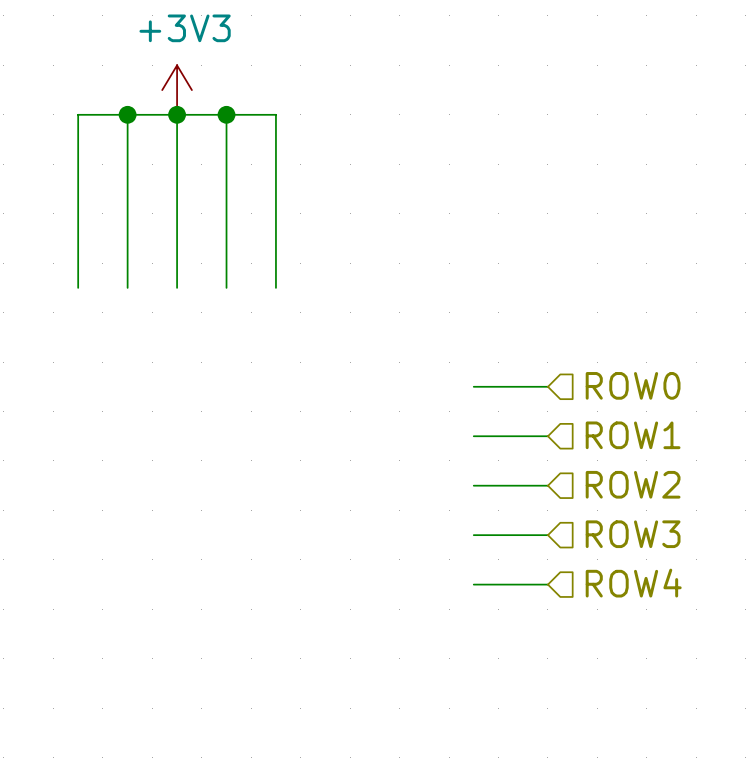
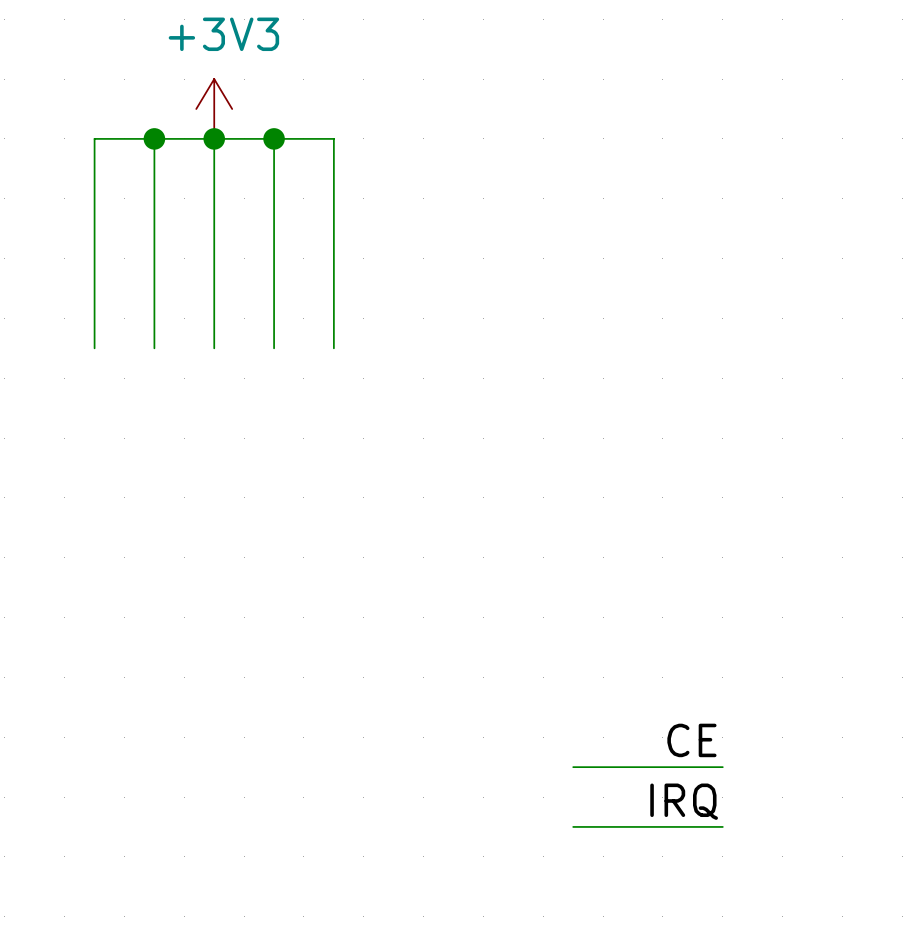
hierarchical label: ROW0 (633, 385) -> none
wire: (473, 386) (547, 386) -> none
hierarchical label: ROW1 (633, 435) -> none
wire: (473, 436) (547, 436) -> none
hierarchical label: ROW2 (633, 484) -> none
wire: (473, 485) (547, 485) -> none
hierarchical label: ROW3 (633, 534) -> none
wire: (473, 535) (547, 535) -> none
hierarchical label: ROW4 (633, 583) -> none
wire: (473, 584) (547, 584) -> none
label: none -> CE (691, 740)
wire: none -> (573, 767) (722, 767)
label: none -> IRQ (684, 801)
wire: none -> (573, 826) (722, 826)

